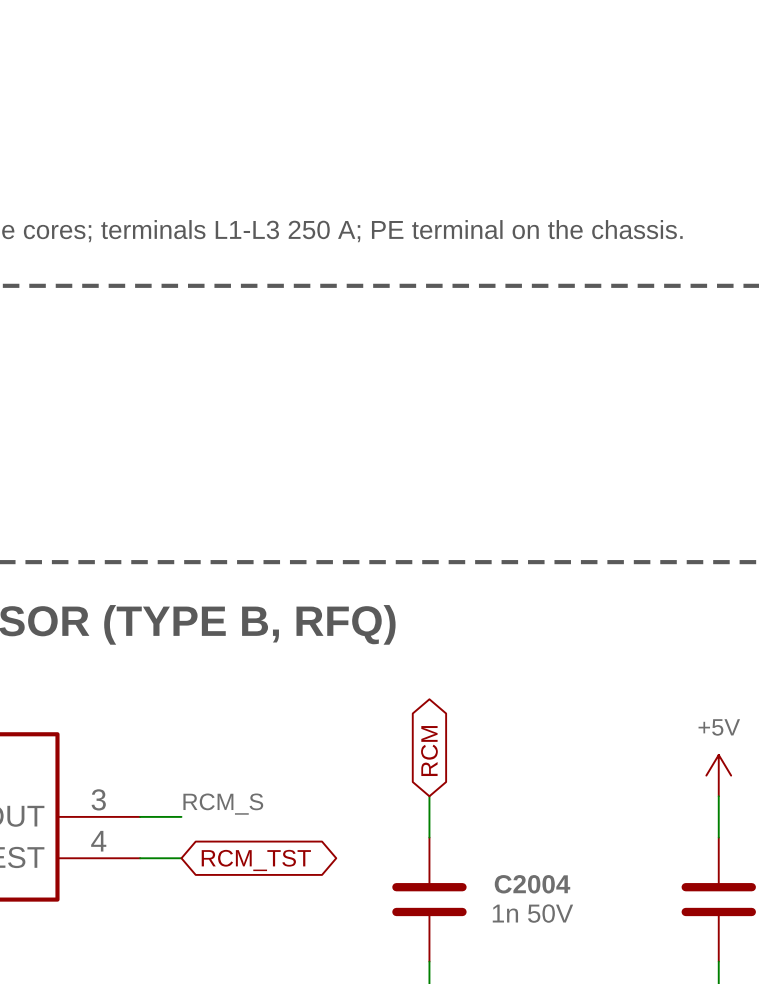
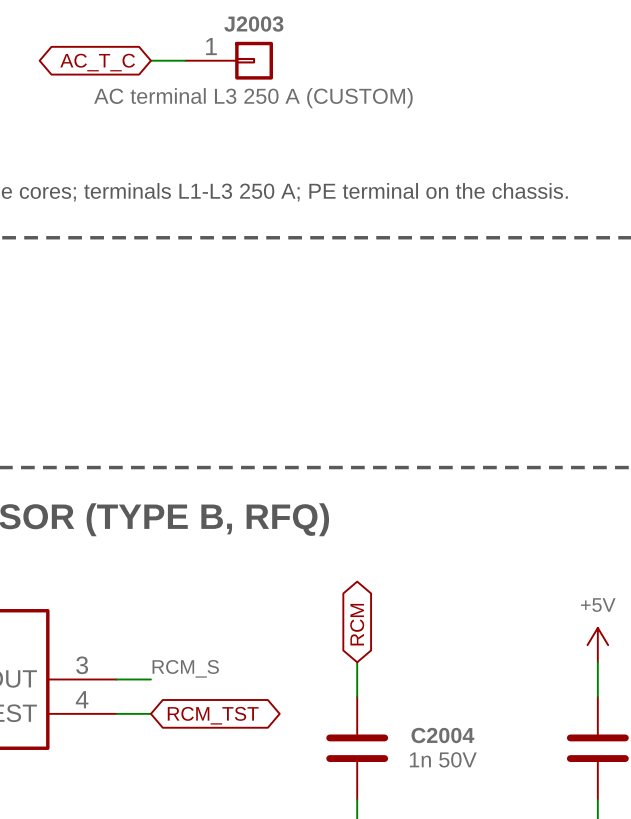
wire: none -> (150, 60) (185, 60)
J2003: none -> AC terminal L3 250 A (CUSTOM) (229, 60)
global label: none -> AC_T_C (97, 62)

